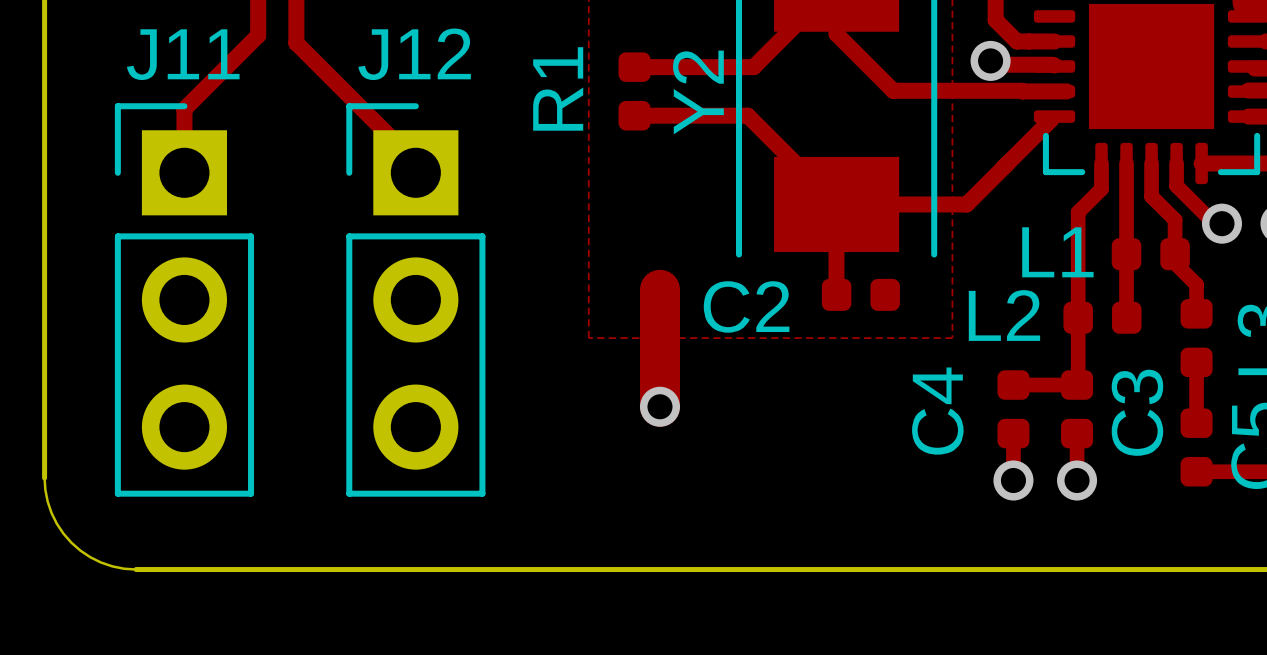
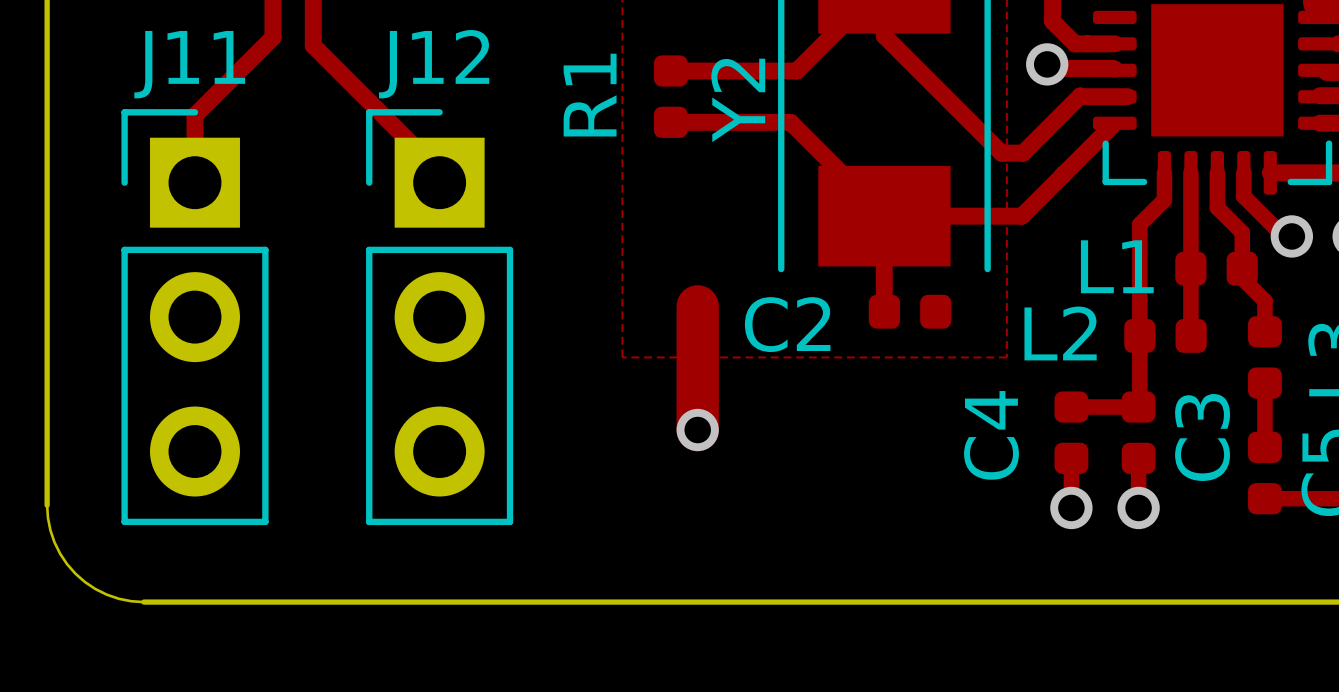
top track: (893, 90) (1021, 90) -> (944, 95) (1001, 153) (1023, 153) (1080, 95)

